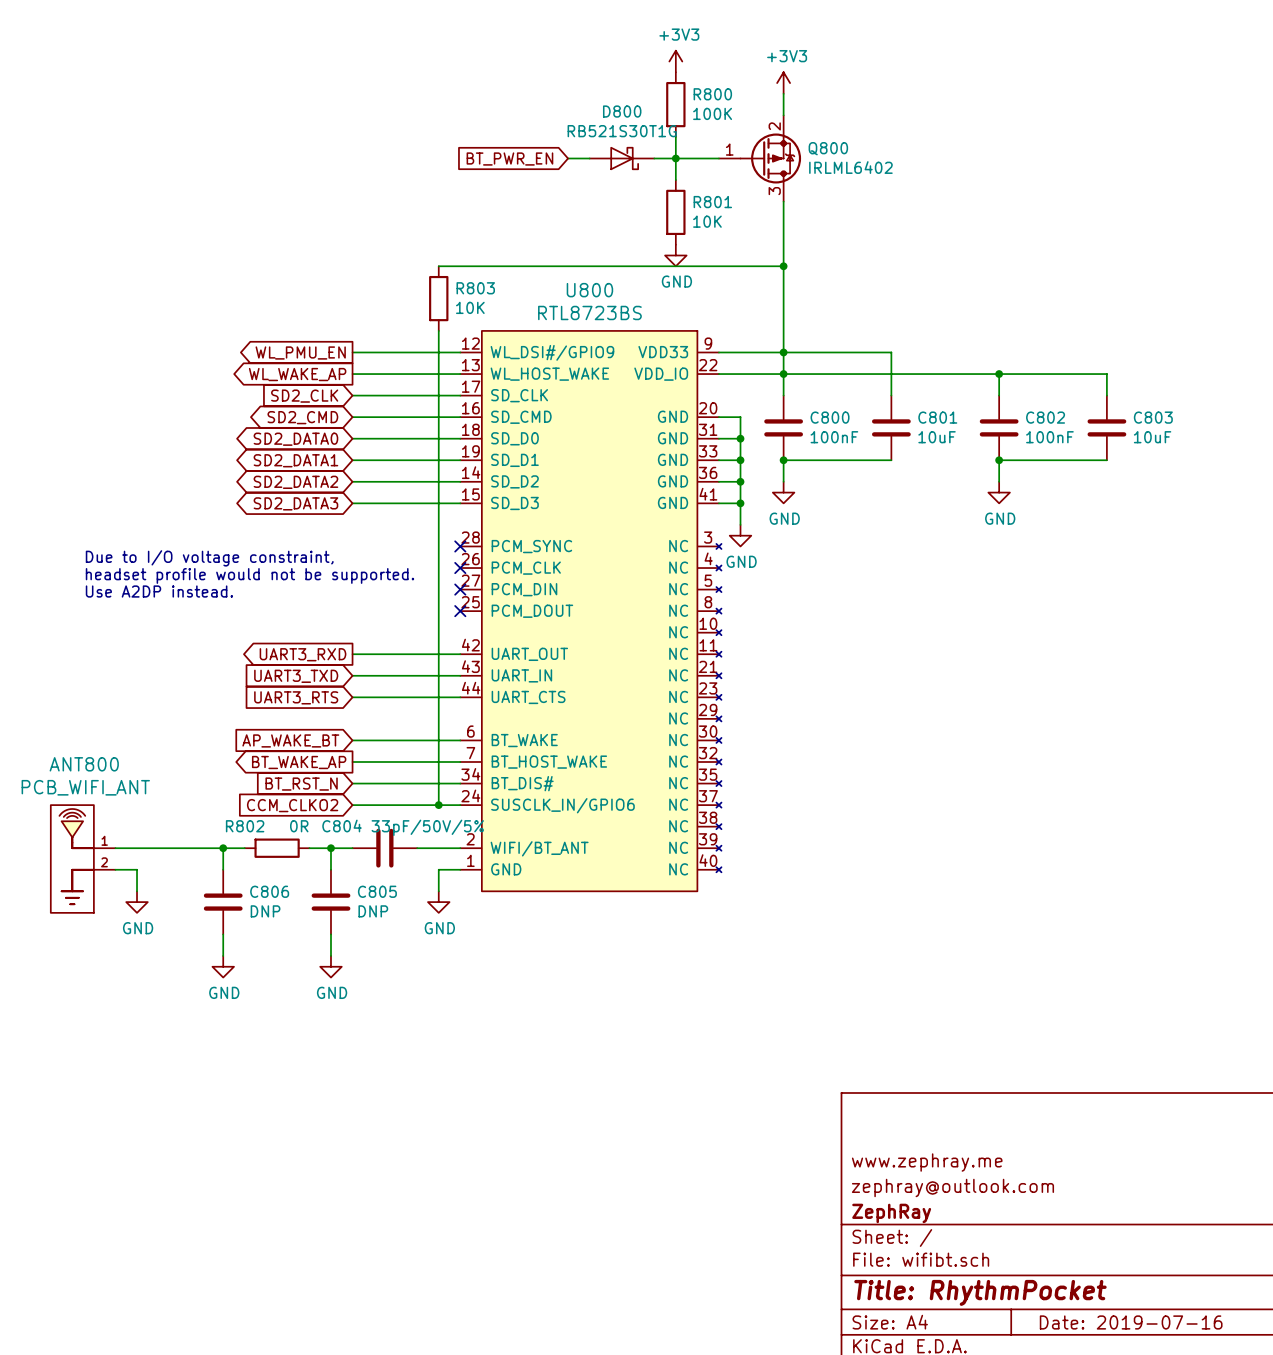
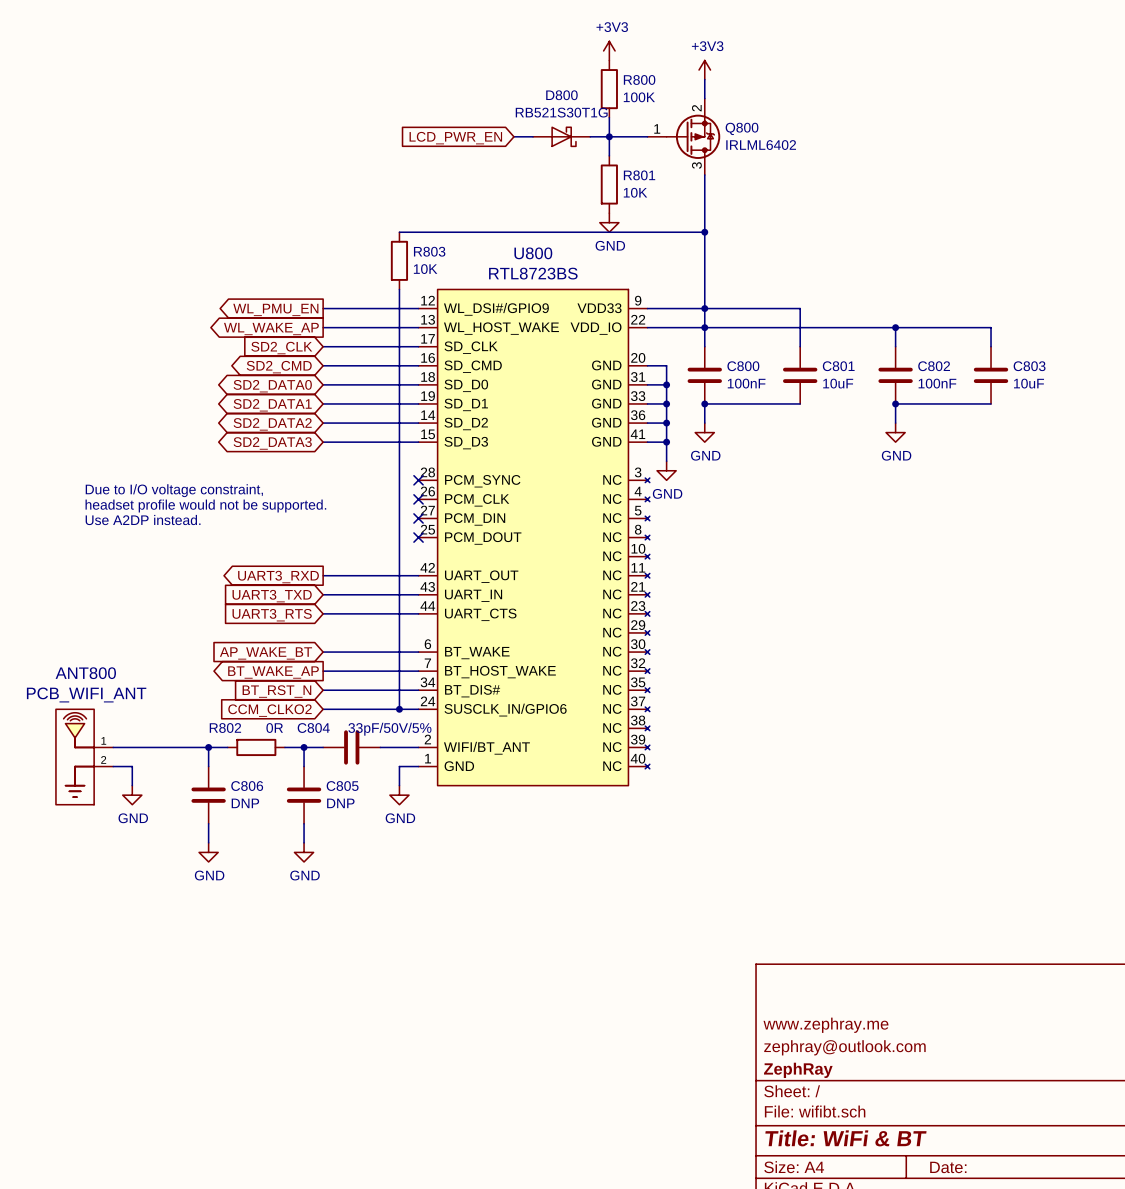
global label: BT_PWR_EN (509, 159) -> LCD_PWR_EN (455, 138)
title block: Title: RhythmPocket (980, 1292) -> Title: WiFi & BT (845, 1138)
title block: Date: 2019-07-16 (1131, 1322) -> Date: (948, 1167)

